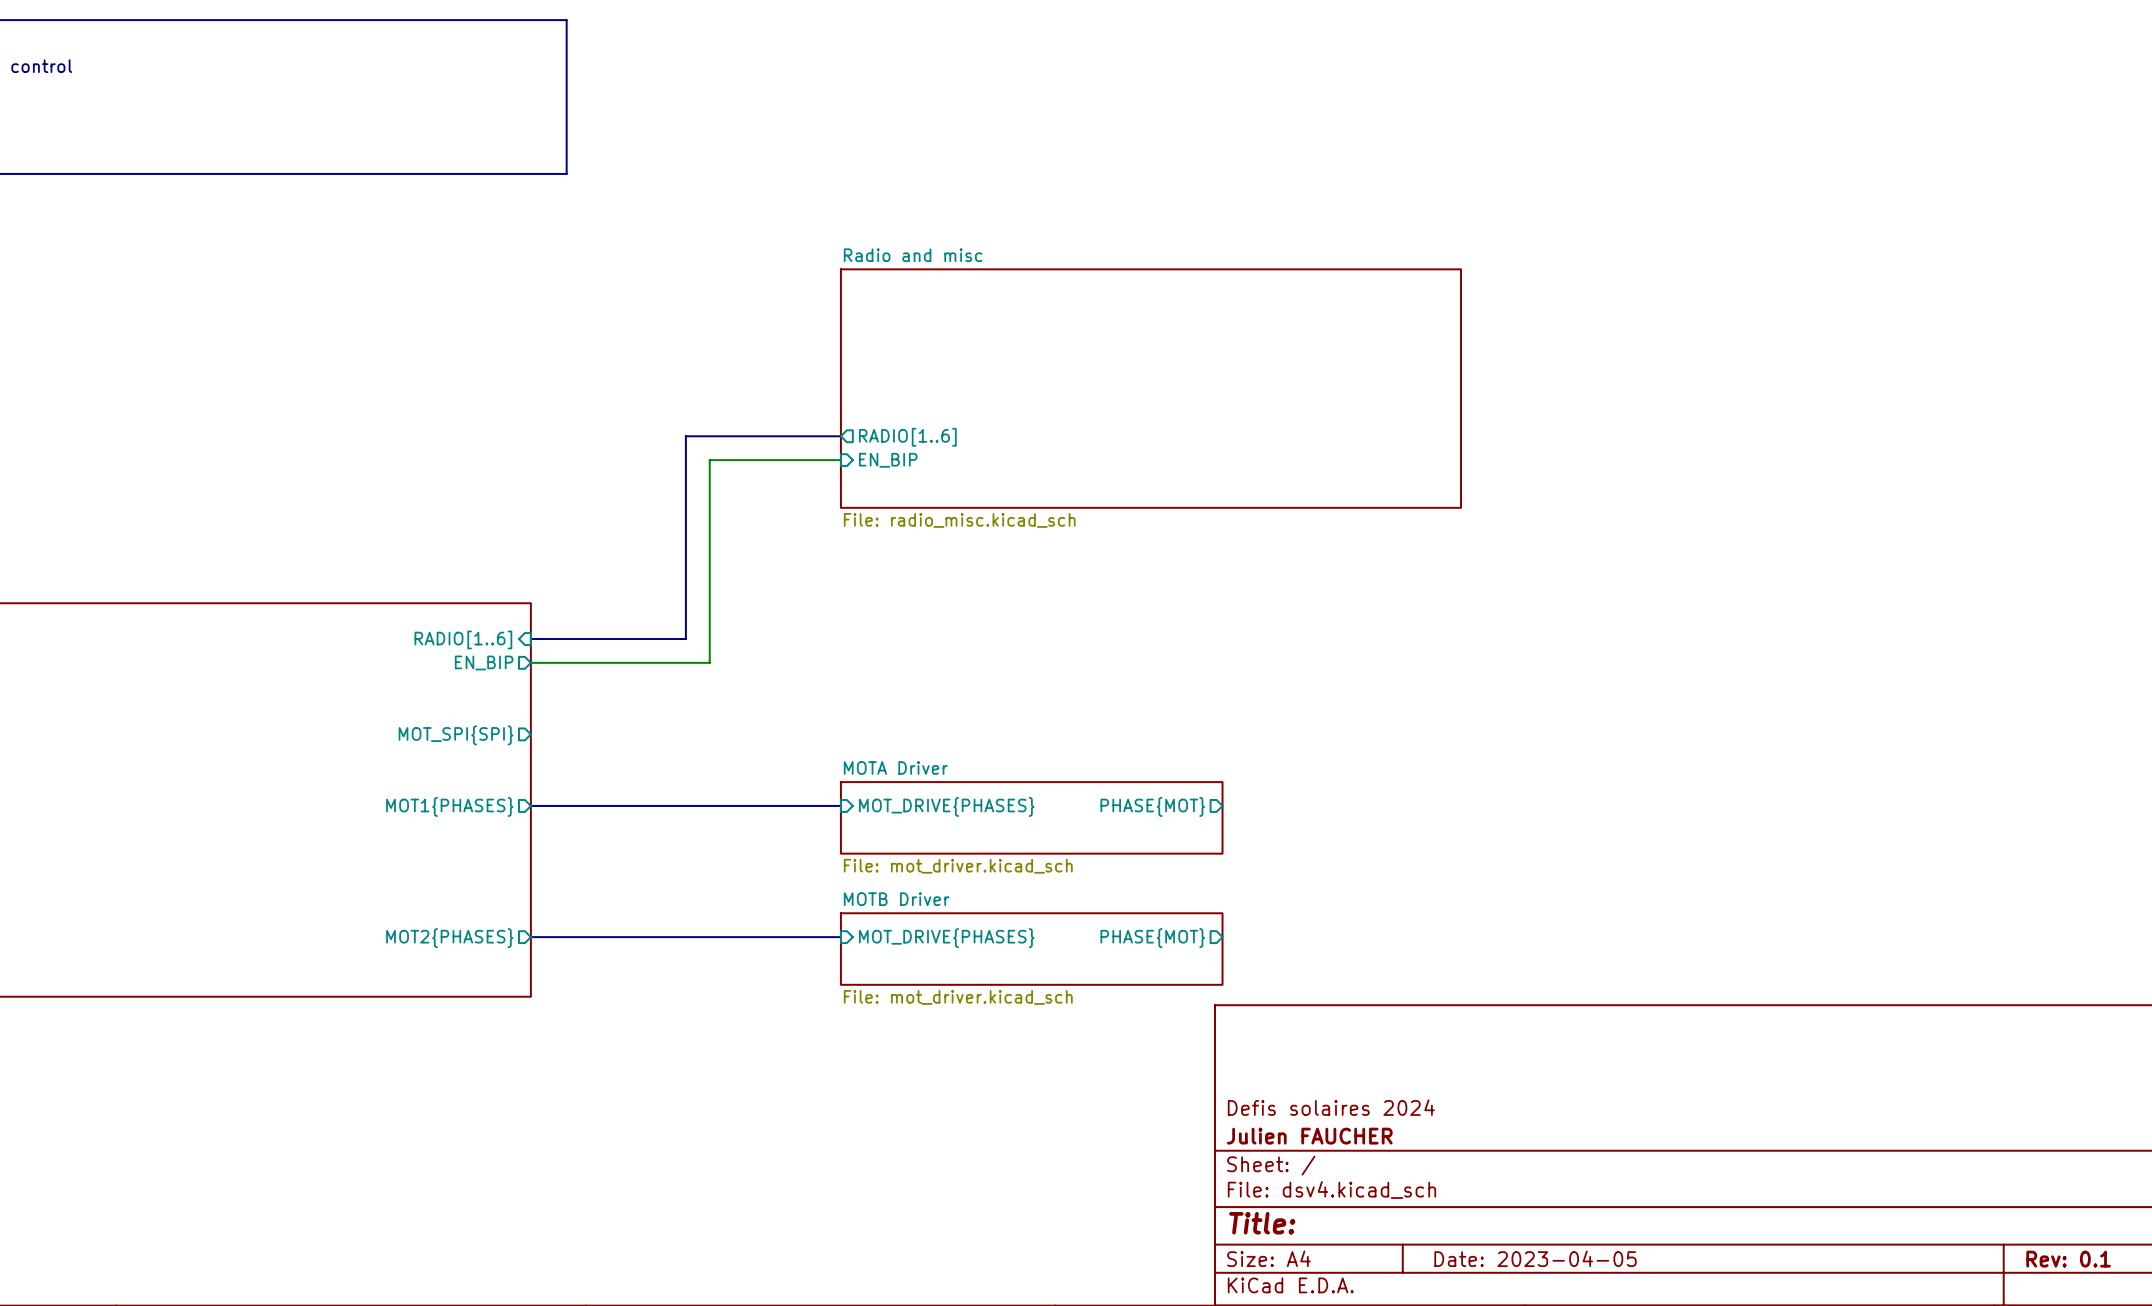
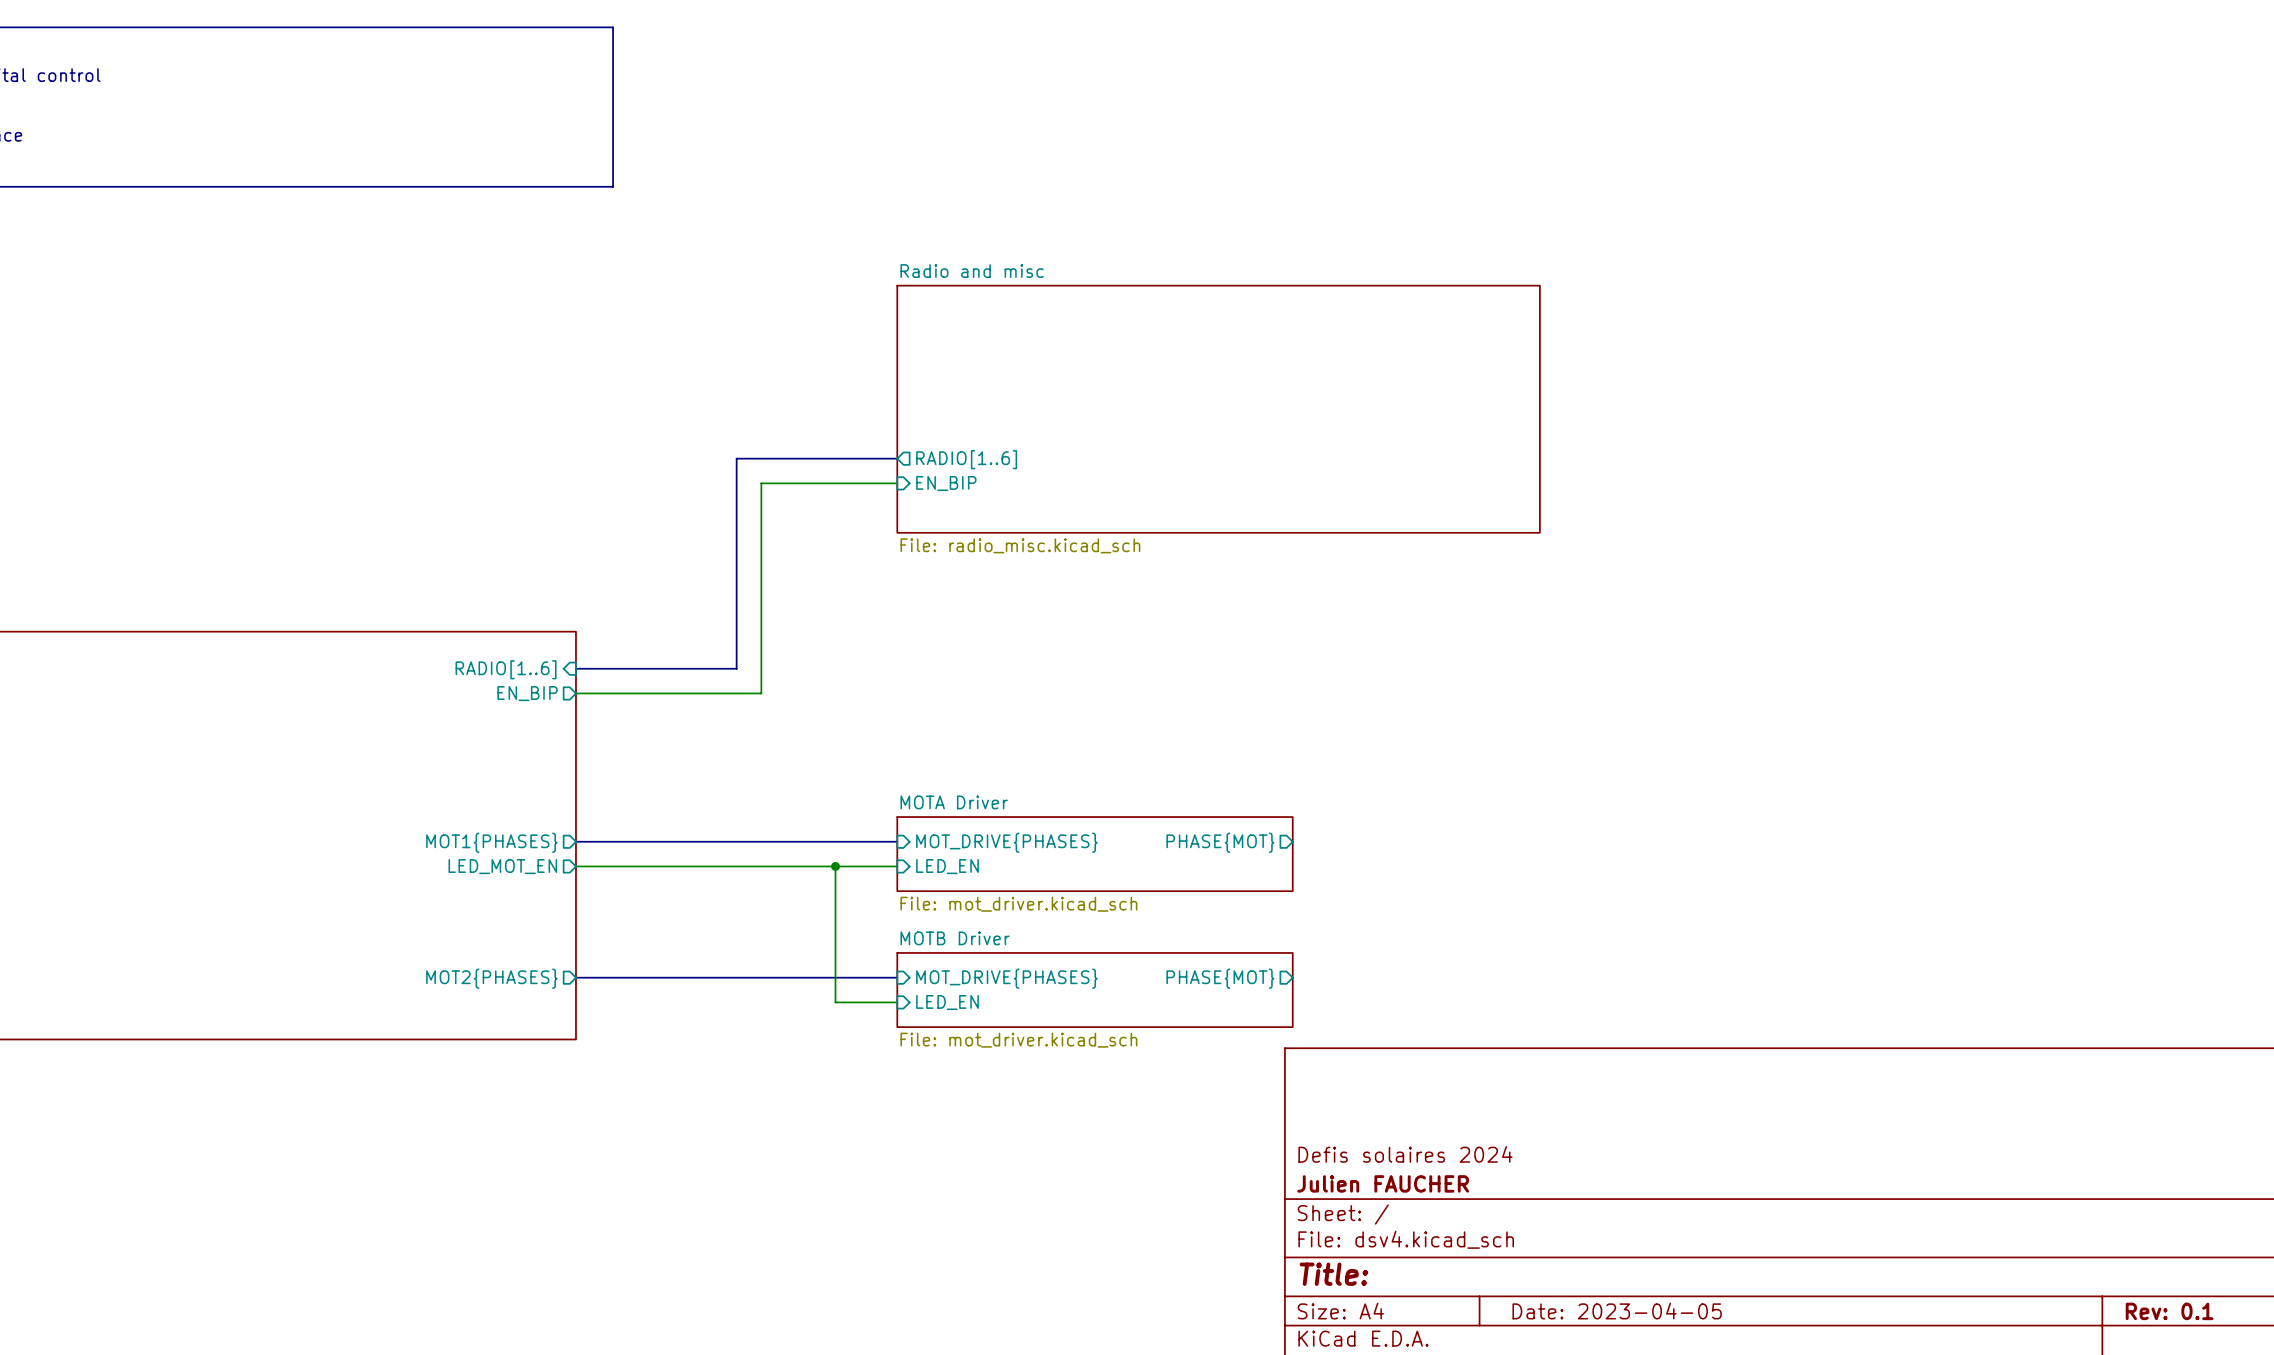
sheet pin: MOT_SPI{SPI} (456, 735) -> none
sheet pin: none -> LED_MOT_EN (502, 866)
wire: none -> (575, 866) (897, 866)
wire: none -> (835, 866) (835, 1002) (897, 1002)
junction: none -> (835, 866)
sheet pin: none -> LED_EN (947, 866)
sheet pin: none -> LED_EN (947, 1002)

